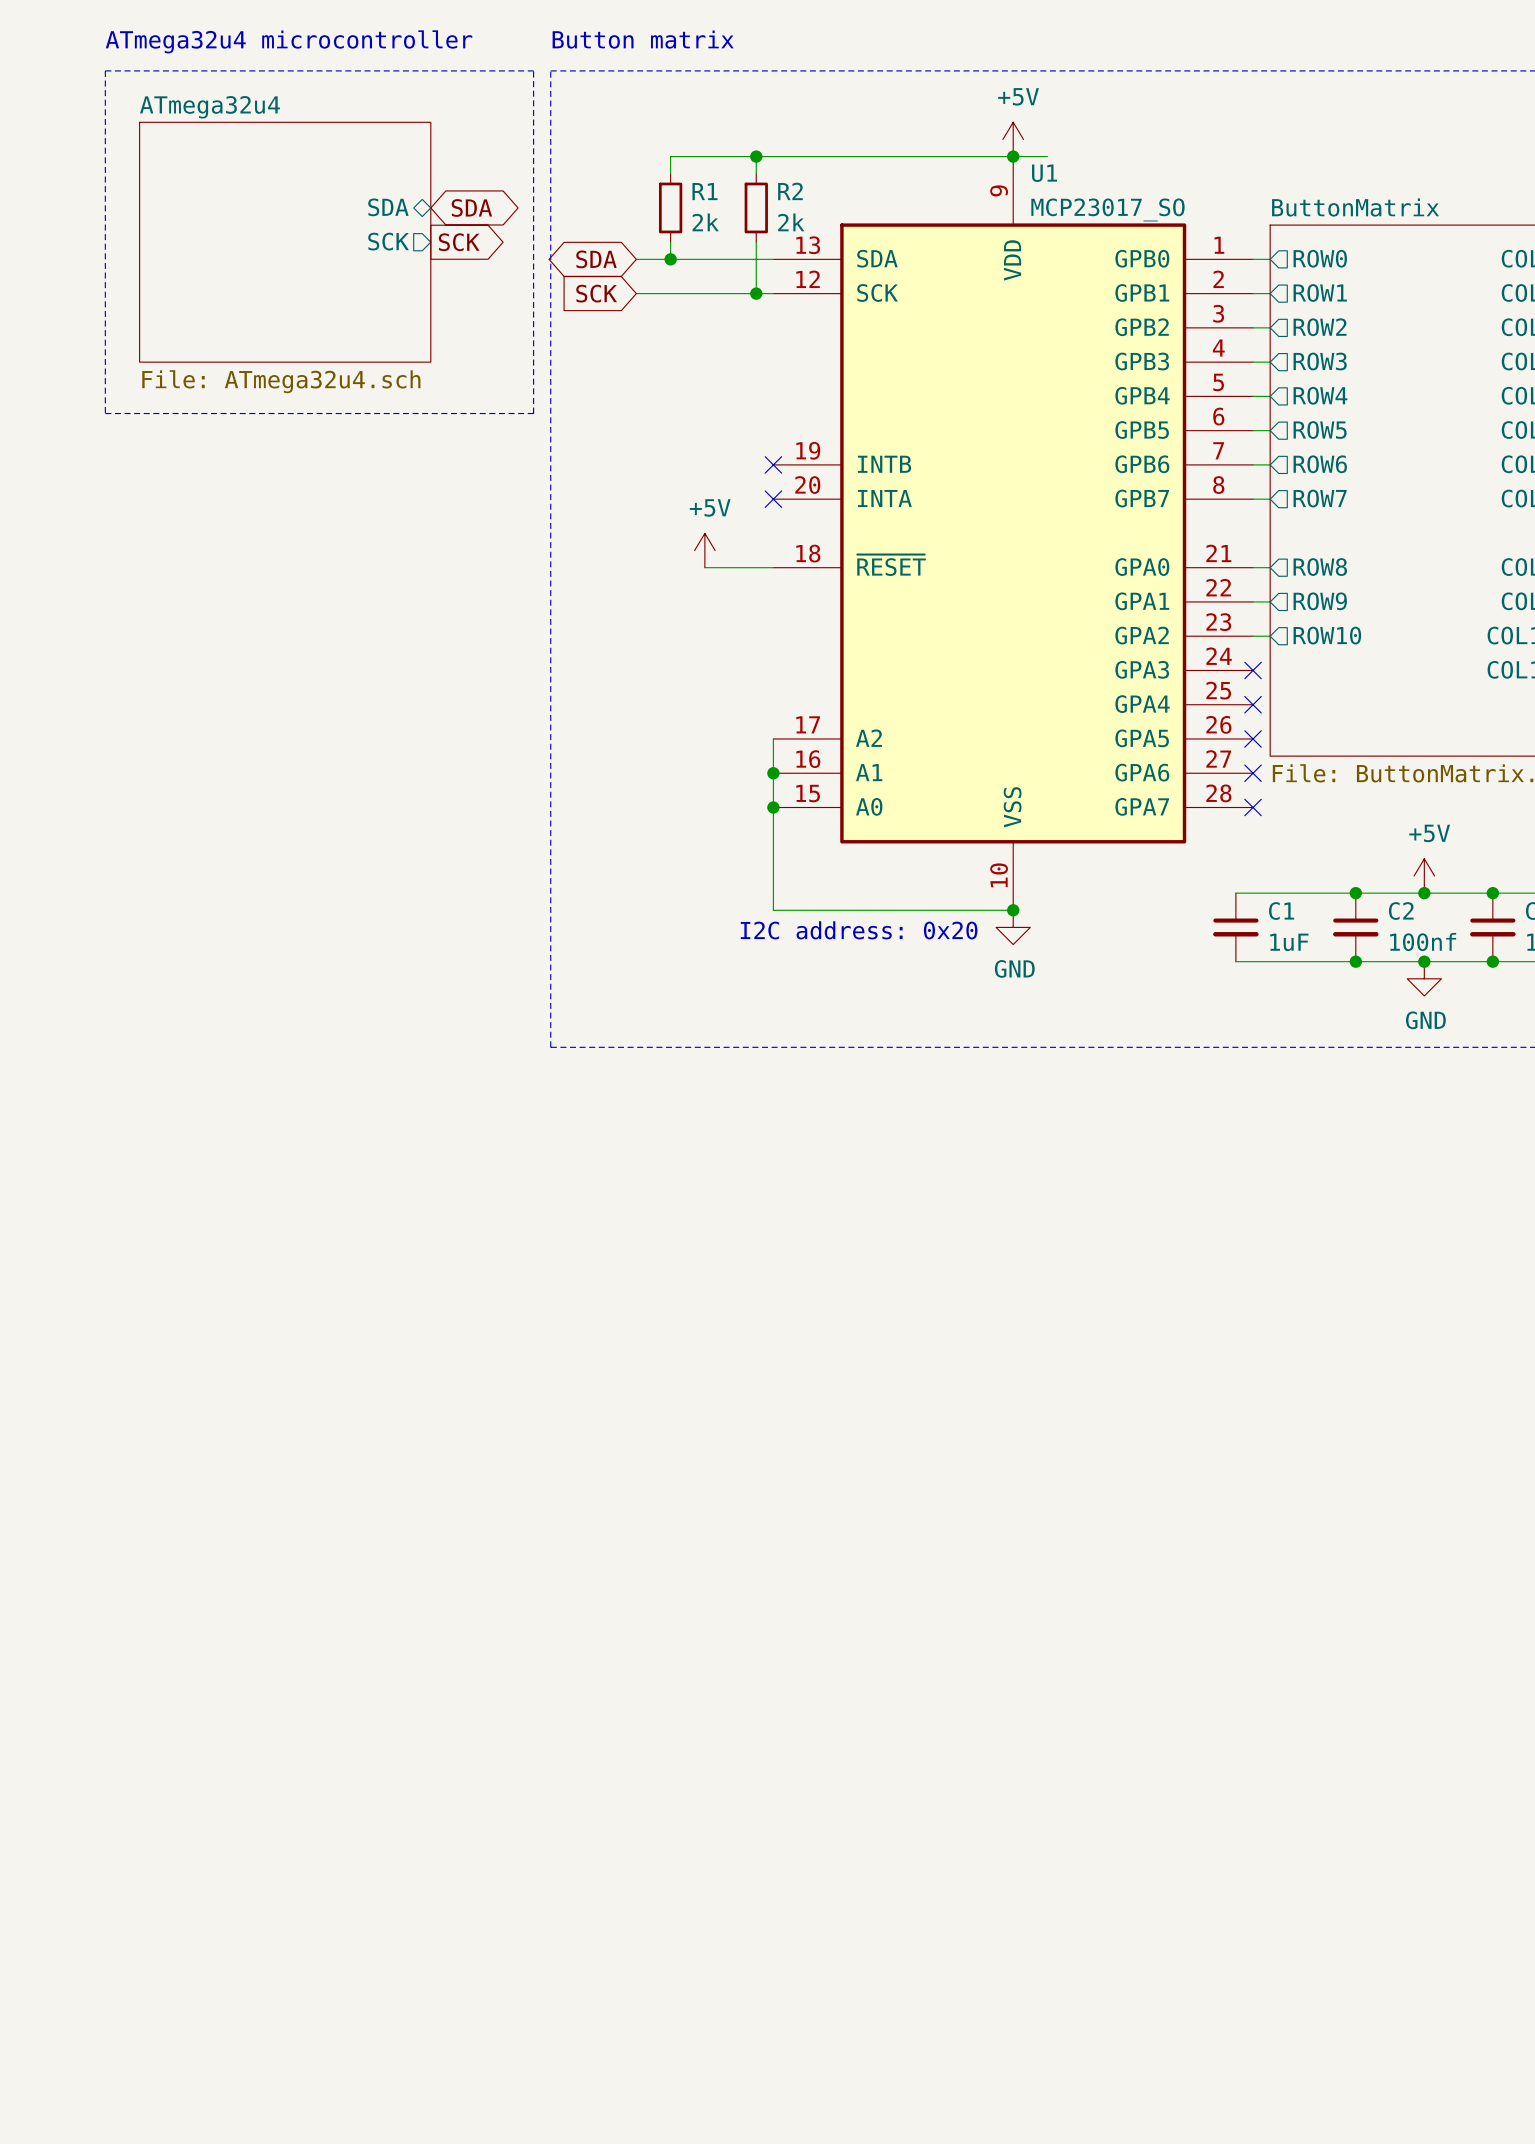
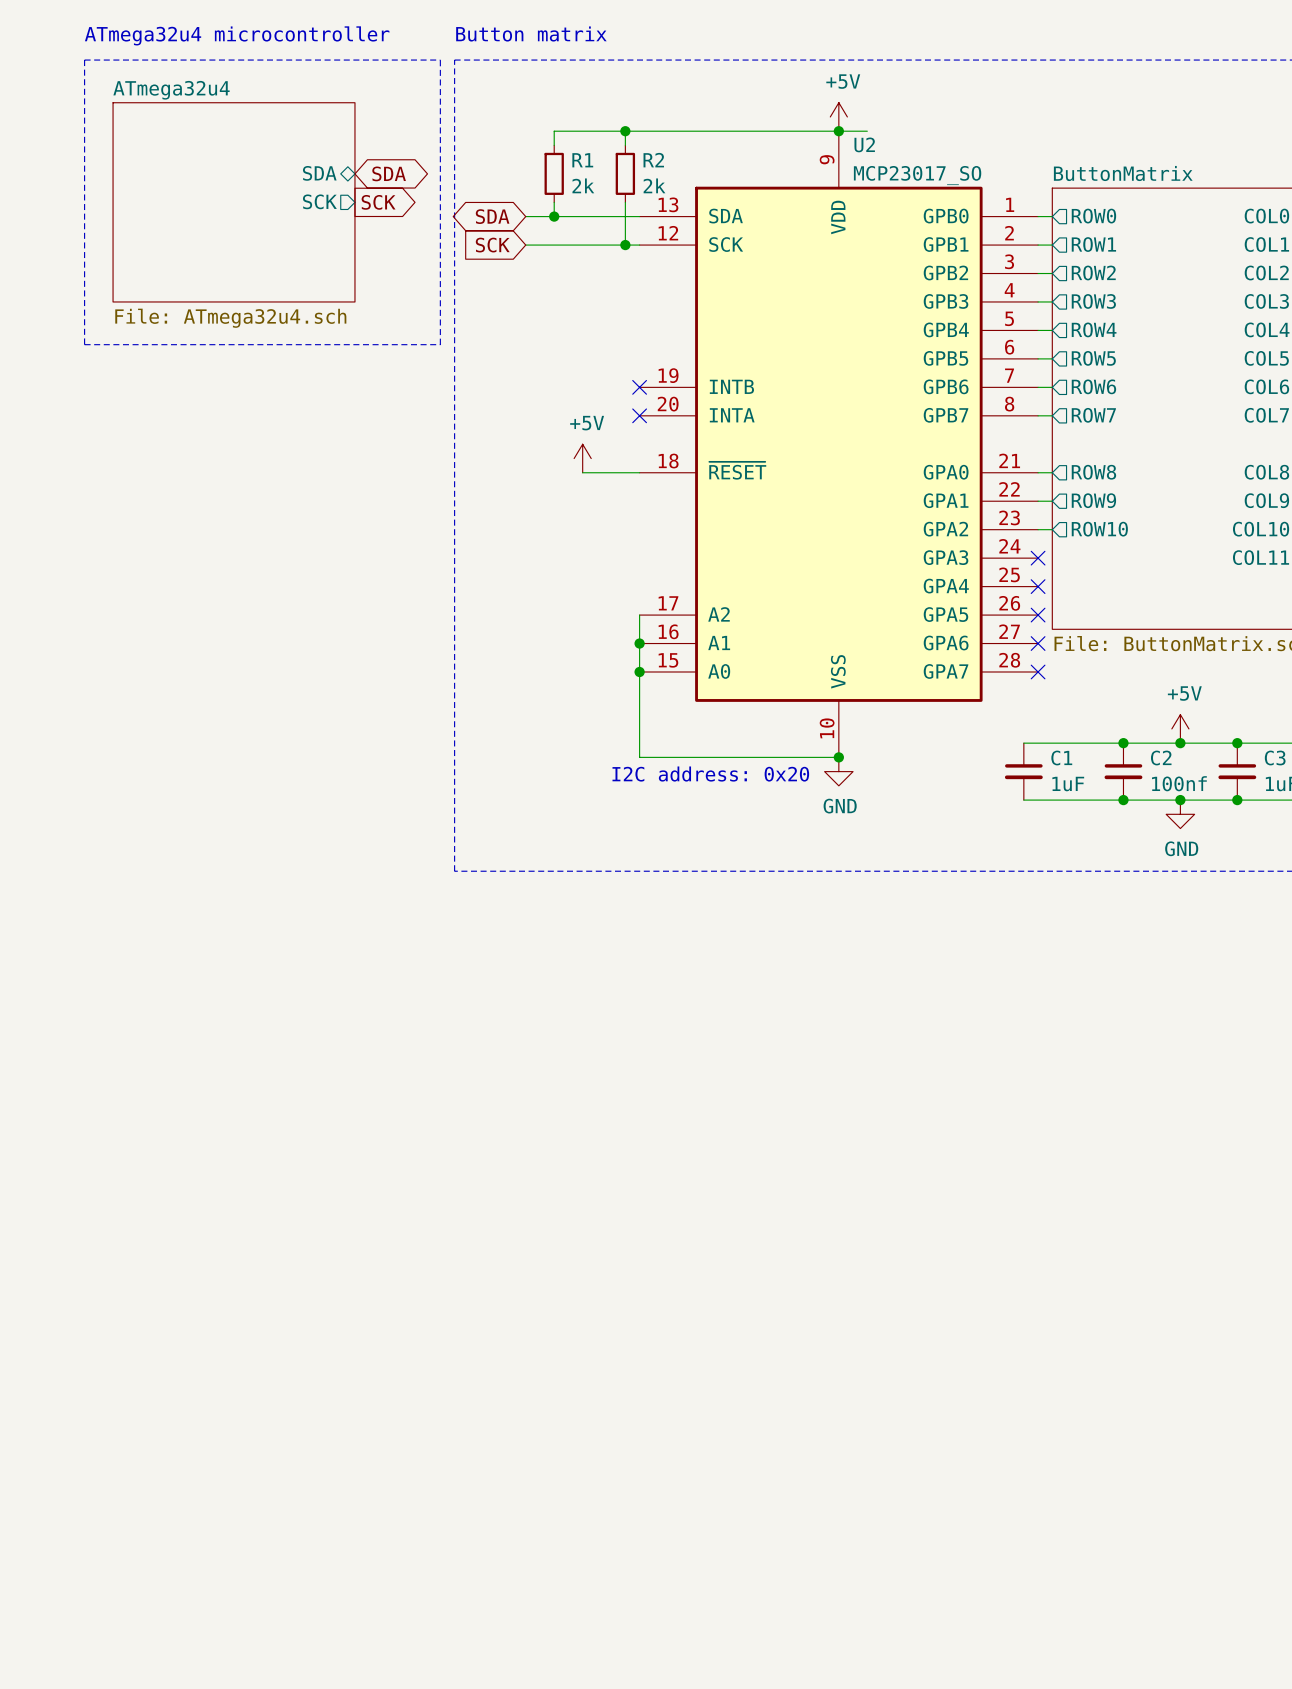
U1 name: U1 (1044, 173) -> U2 (864, 144)

